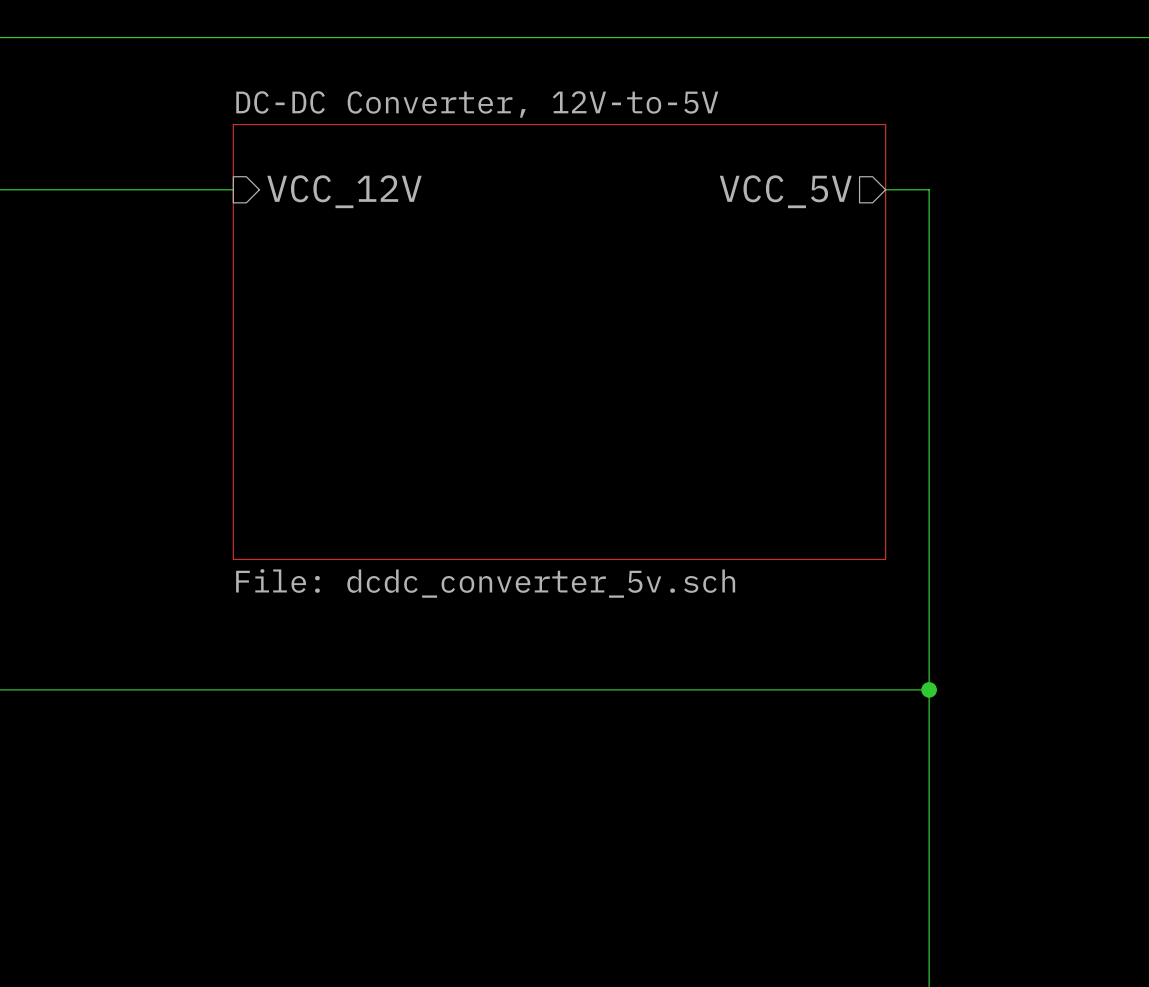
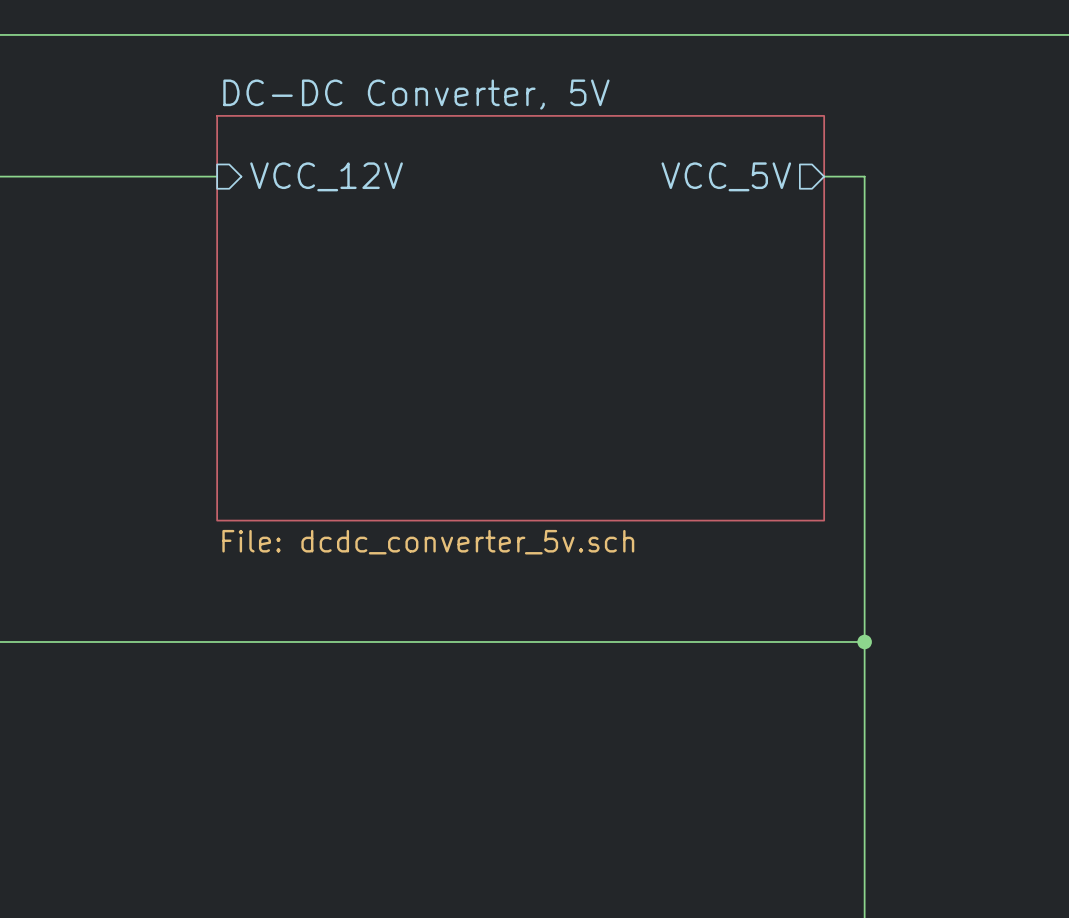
sheet DC-DC Converter, 12V-to-5V name: DC-DC Converter, 12V-to-5V (477, 104) -> DC-DC Converter, 5V (416, 94)

